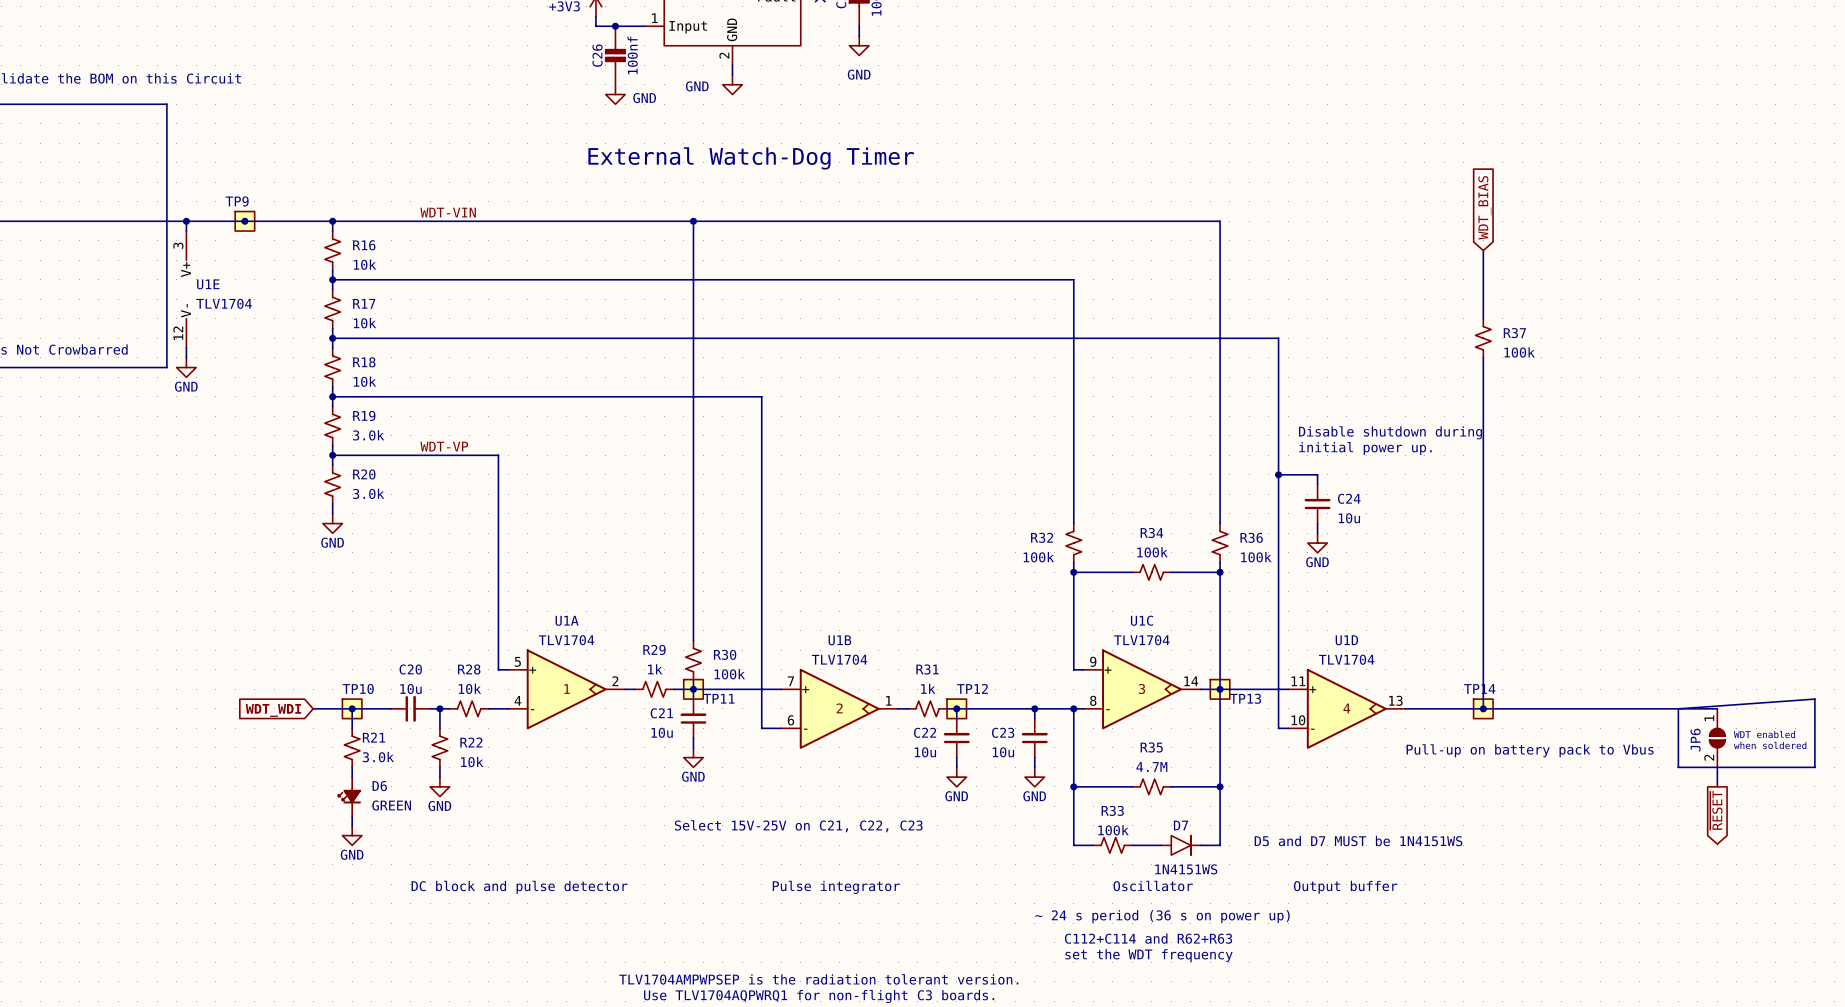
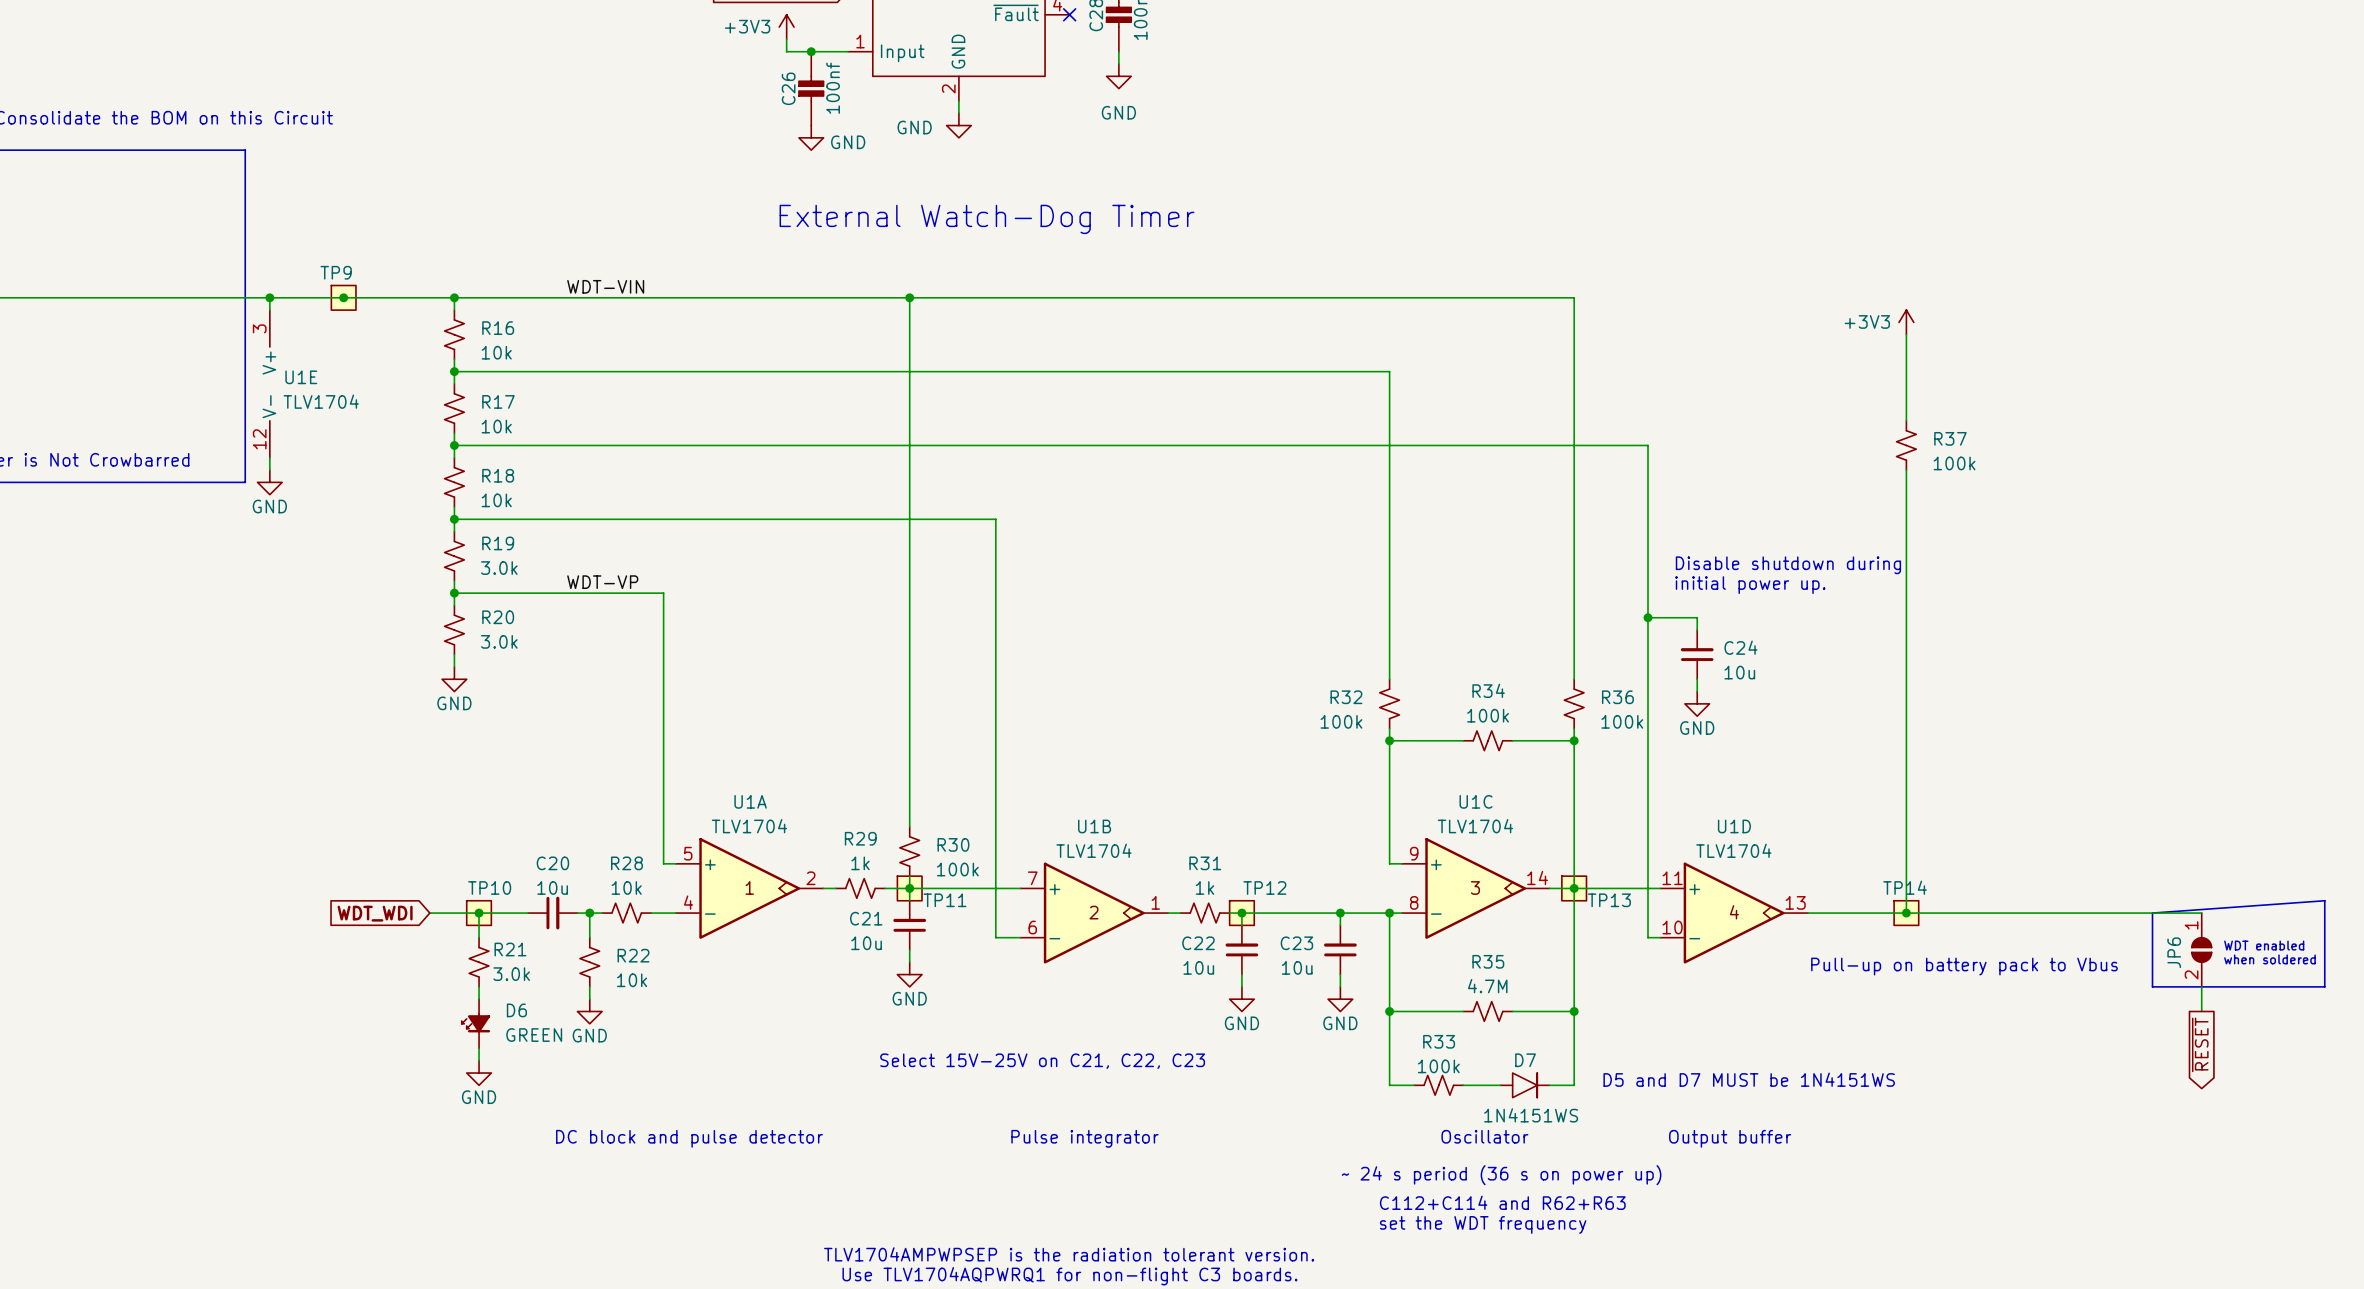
global label: WDT_BIAS (1484, 207) -> none
power symbol: none -> +3V3 (1906, 322)

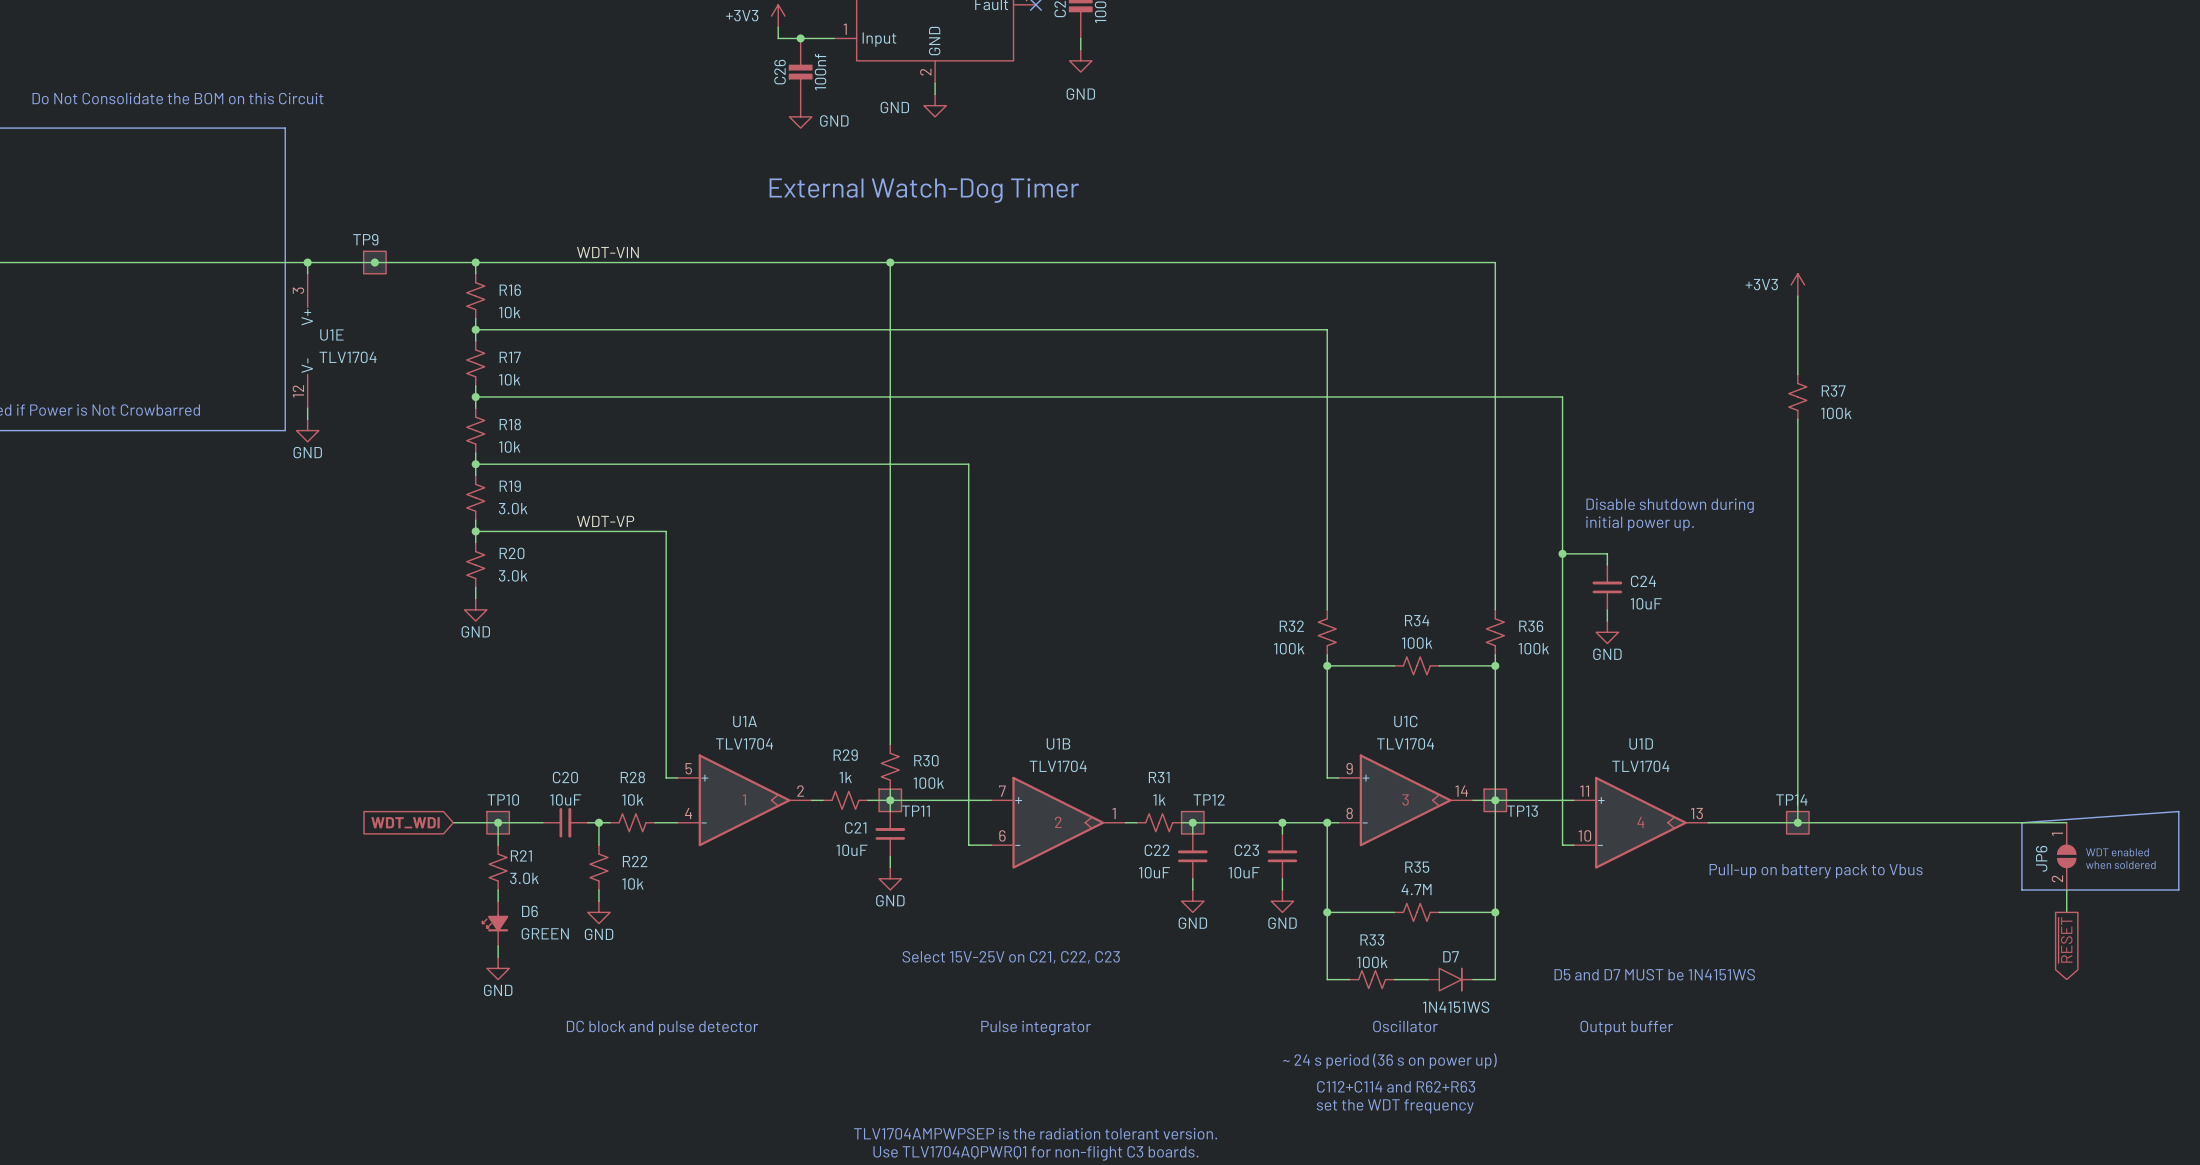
C24 value: 10u (1739, 672) -> 10uF (1646, 603)
C20 value: 10u (552, 887) -> 10uF (565, 799)
C21 value: 10u (866, 943) -> 10uF (852, 850)
C22 value: 10u (1198, 967) -> 10uF (1154, 872)
C23 value: 10u (1297, 967) -> 10uF (1244, 872)

